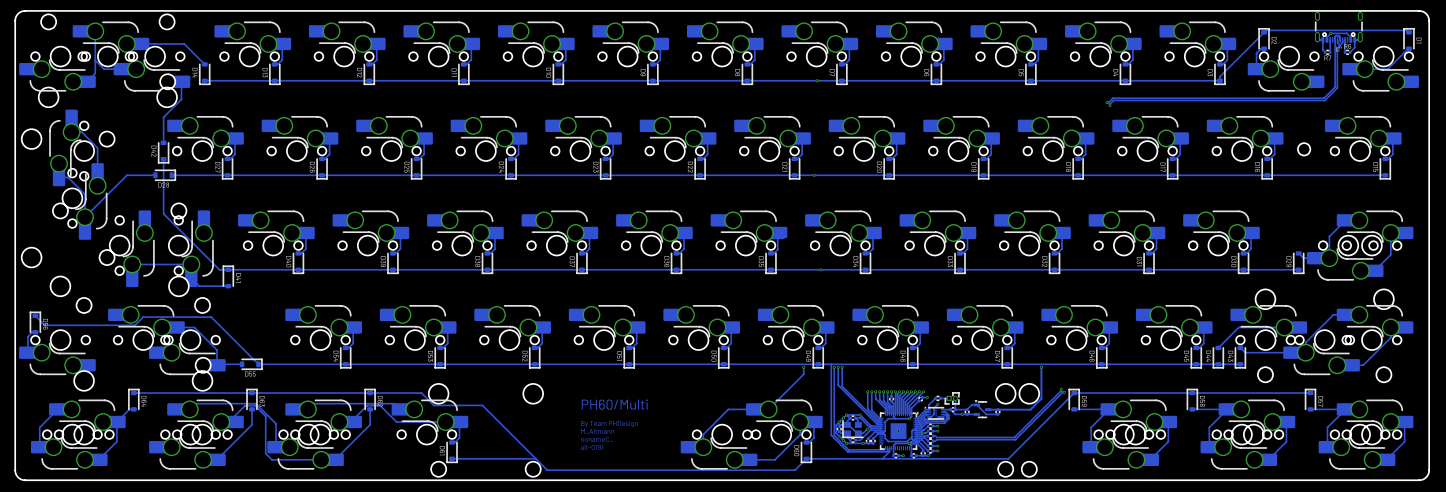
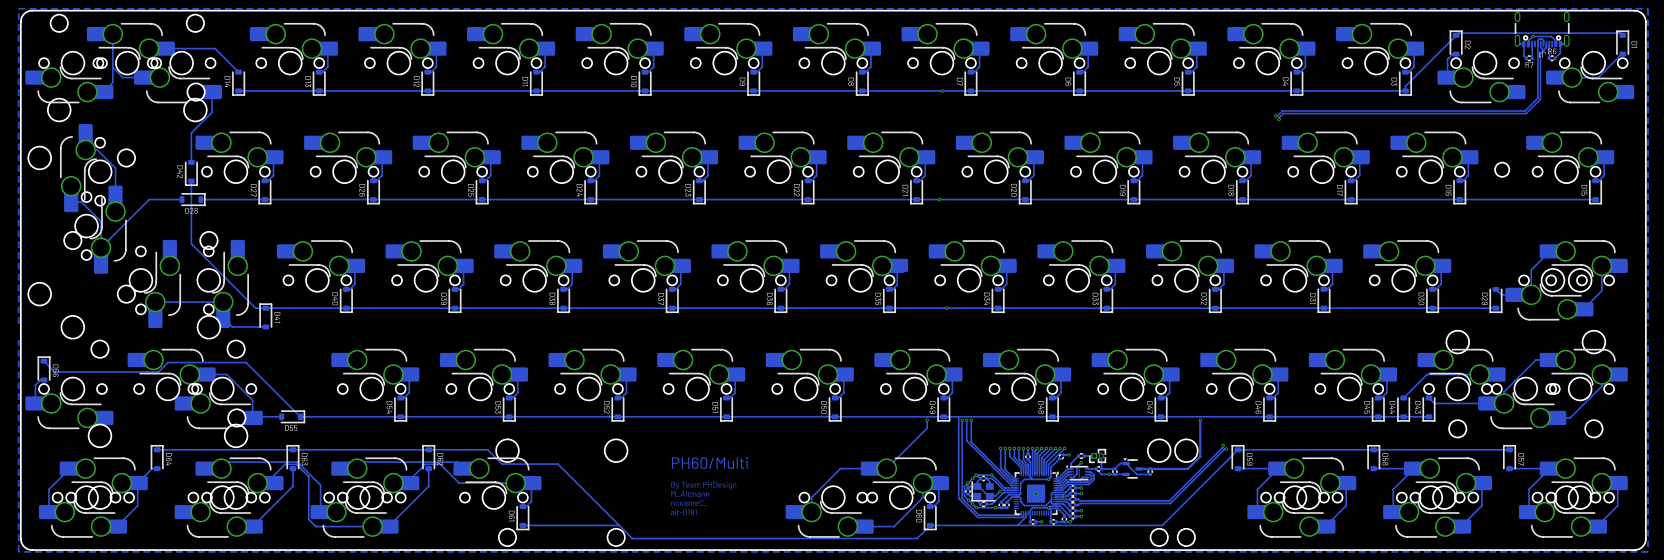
zone outline: none -> (1648, 8) (1648, 551) (18, 551) (18, 8) (1648, 8)

